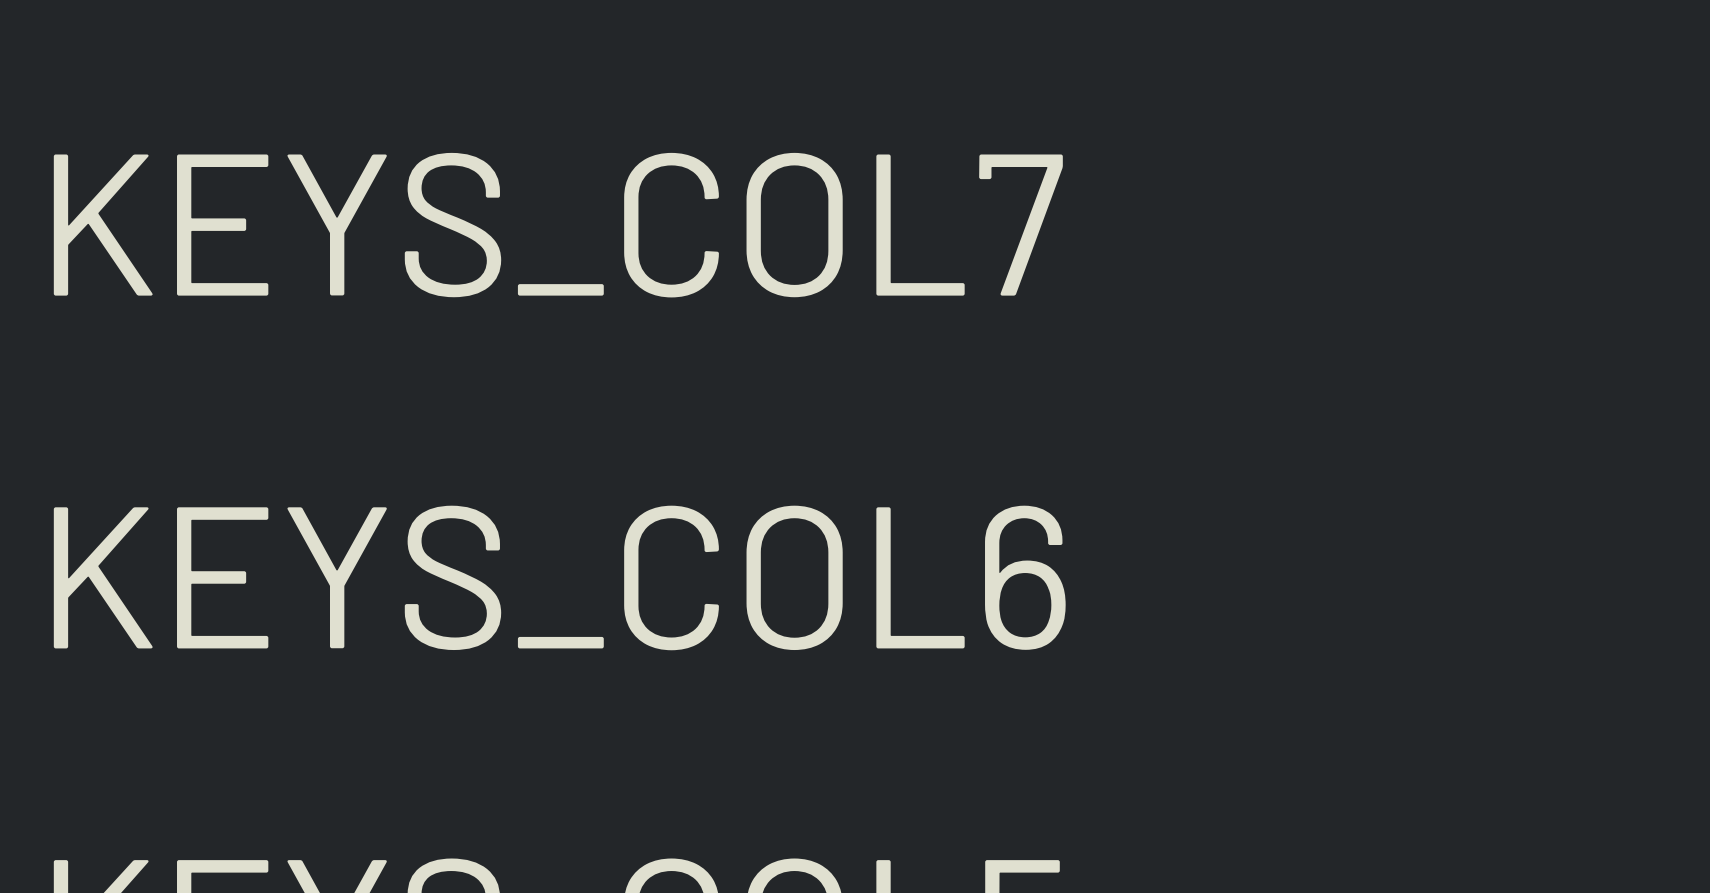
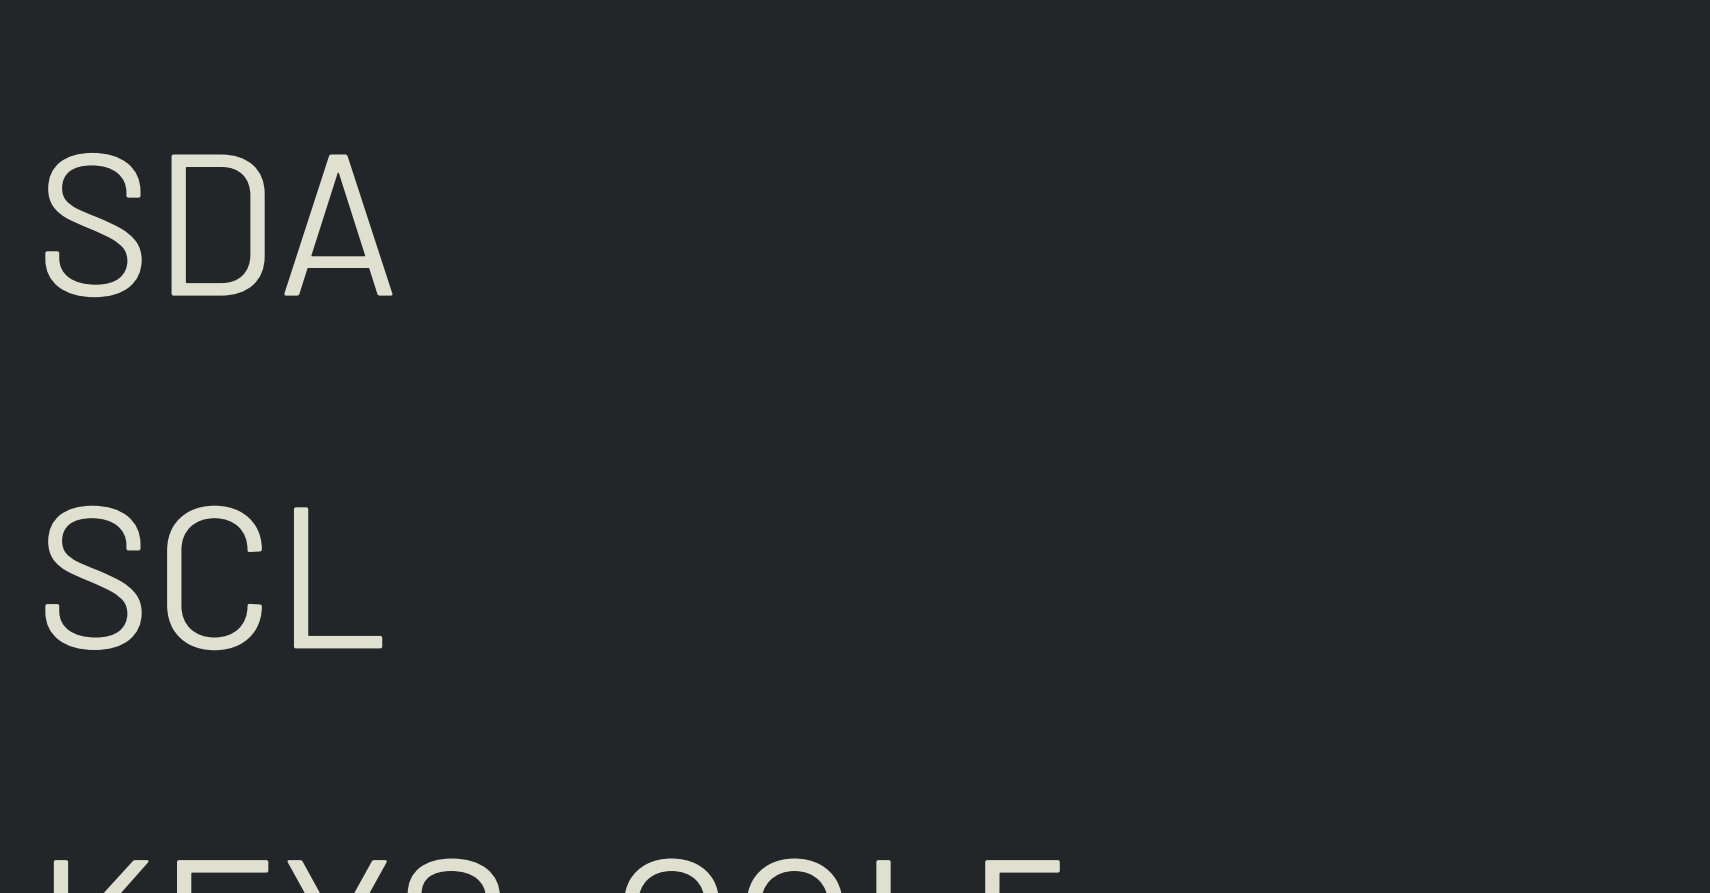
label: KEYS_COL7 (558, 225) -> SDA (218, 225)
label: KEYS_COL6 (559, 577) -> SCL (213, 577)

